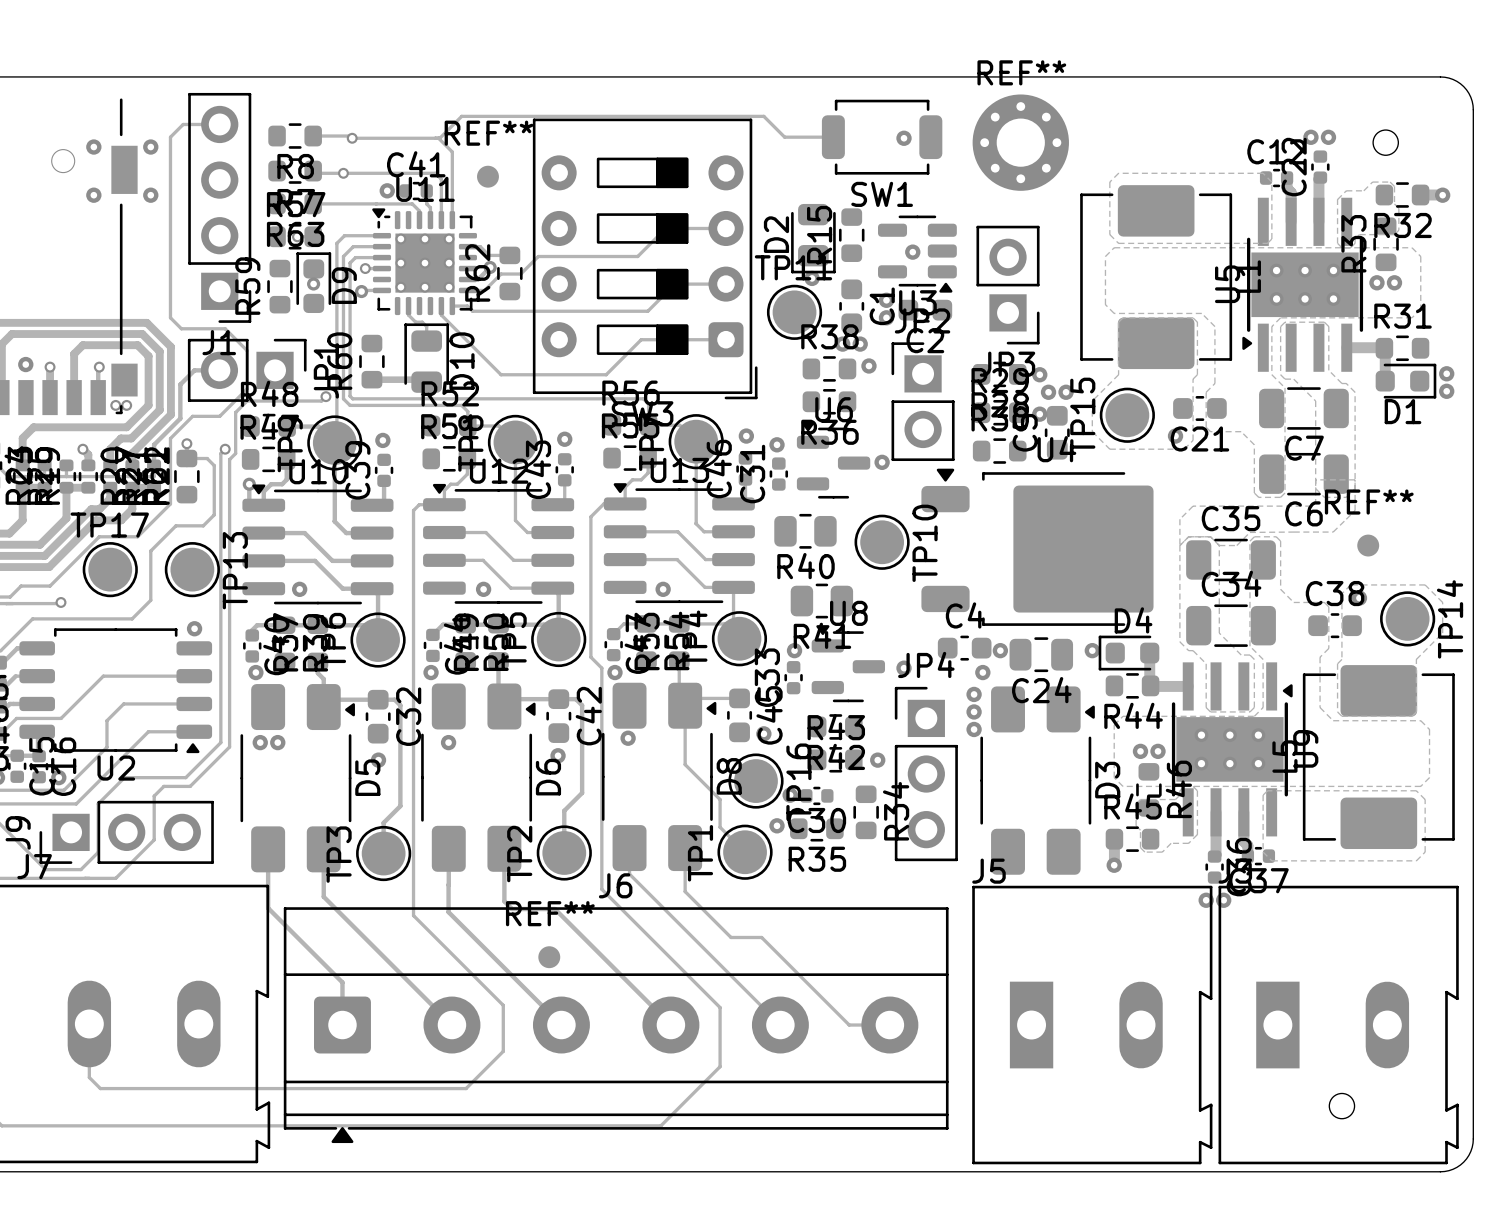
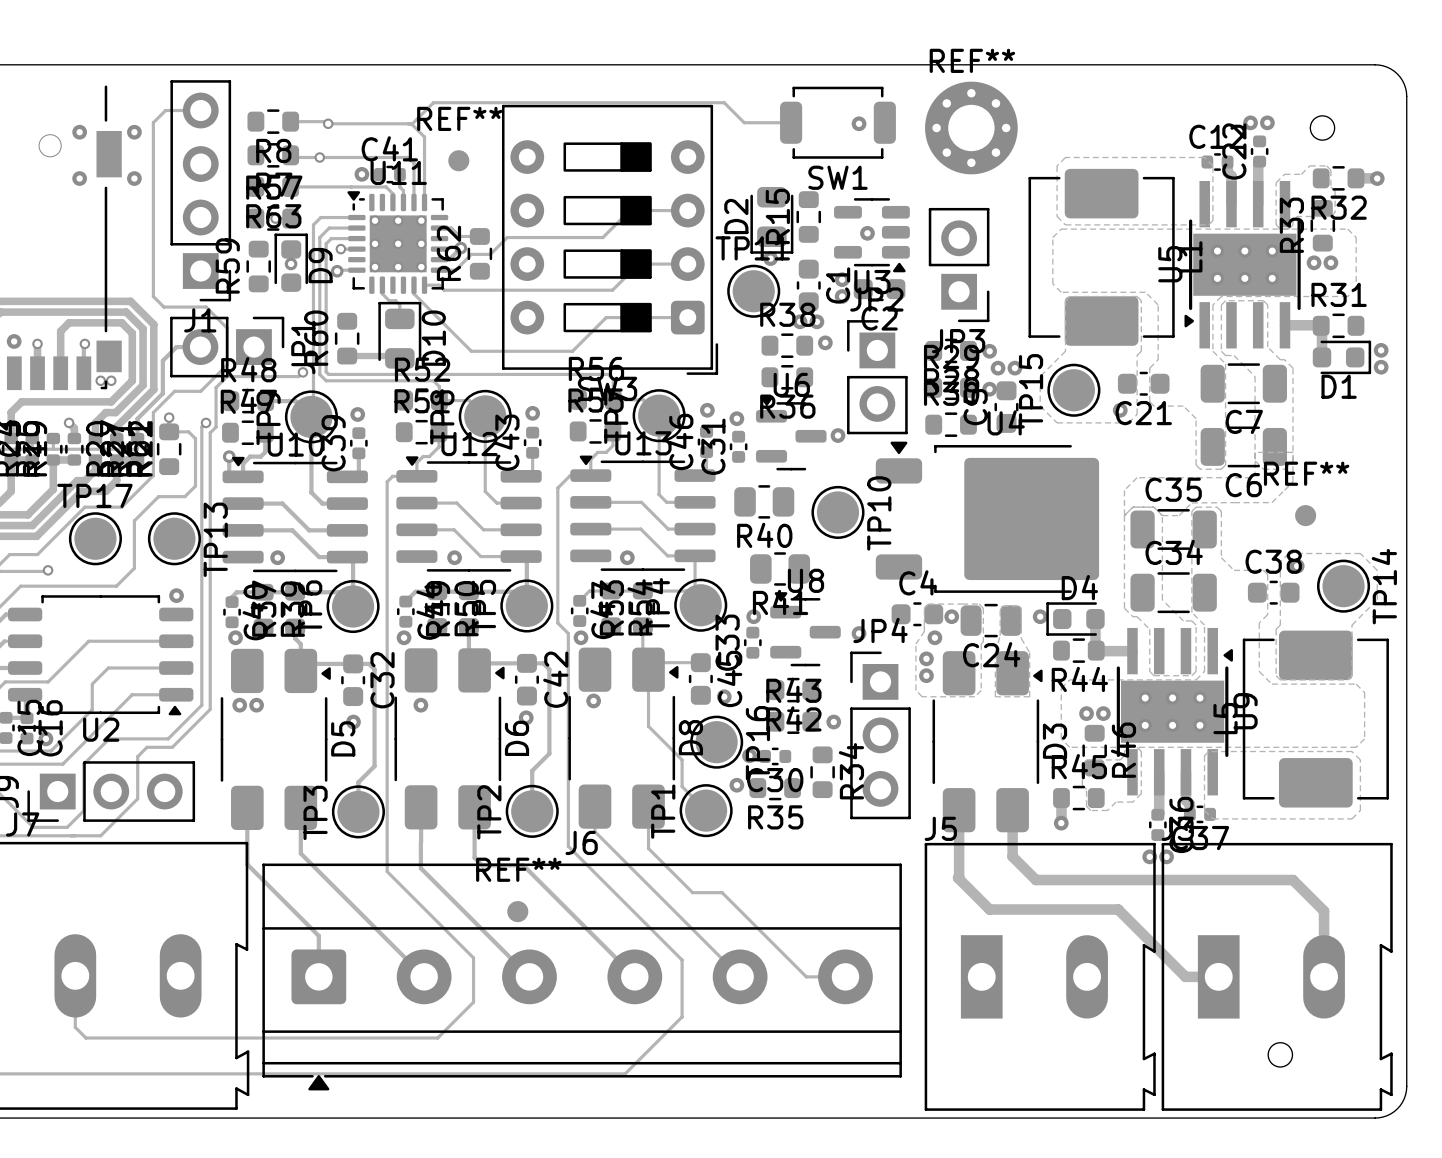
zone outline: none -> (928, 604) (924, 608) (924, 631) (915, 644) (915, 690) (922, 696) (974, 696) (981, 690) (983, 608) (979, 604) (928, 604)
zone outline: none -> (1002, 606) (1000, 610) (1000, 635) (995, 652) (995, 696) (1029, 696) (1029, 652) (1021, 638) (1021, 608) (1019, 606) (1002, 606)
via: (974, 729) -> none
track: none -> (959, 810) (958, 877) (989, 909) (1118, 909) (1185, 976) (1218, 976)
track: none -> (1012, 810) (1012, 856) (1035, 880) (1292, 880) (1324, 911) (1324, 976)

